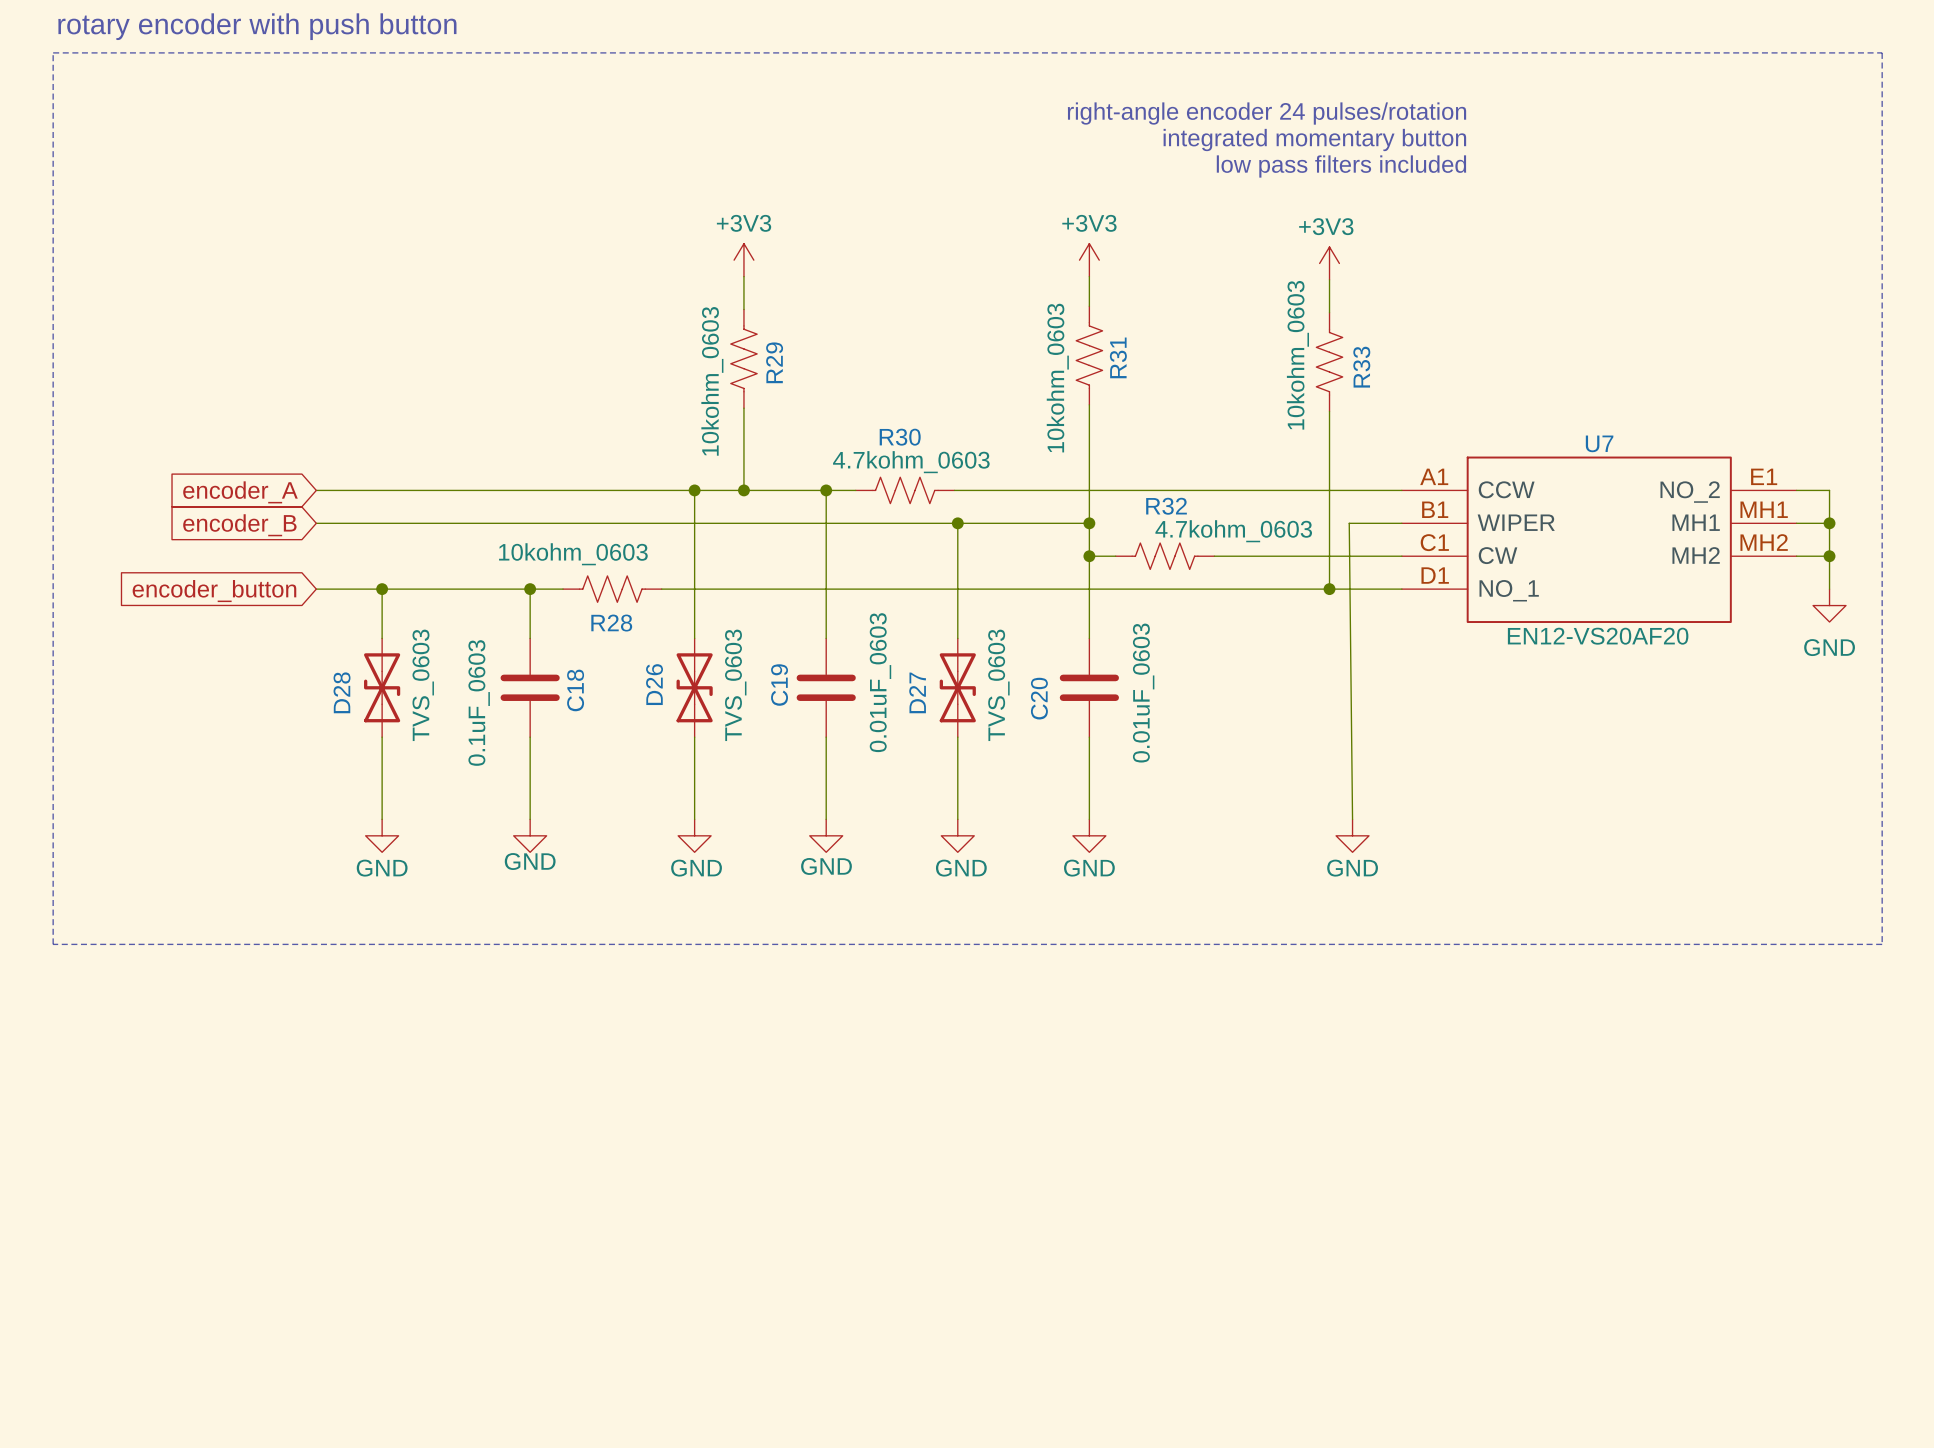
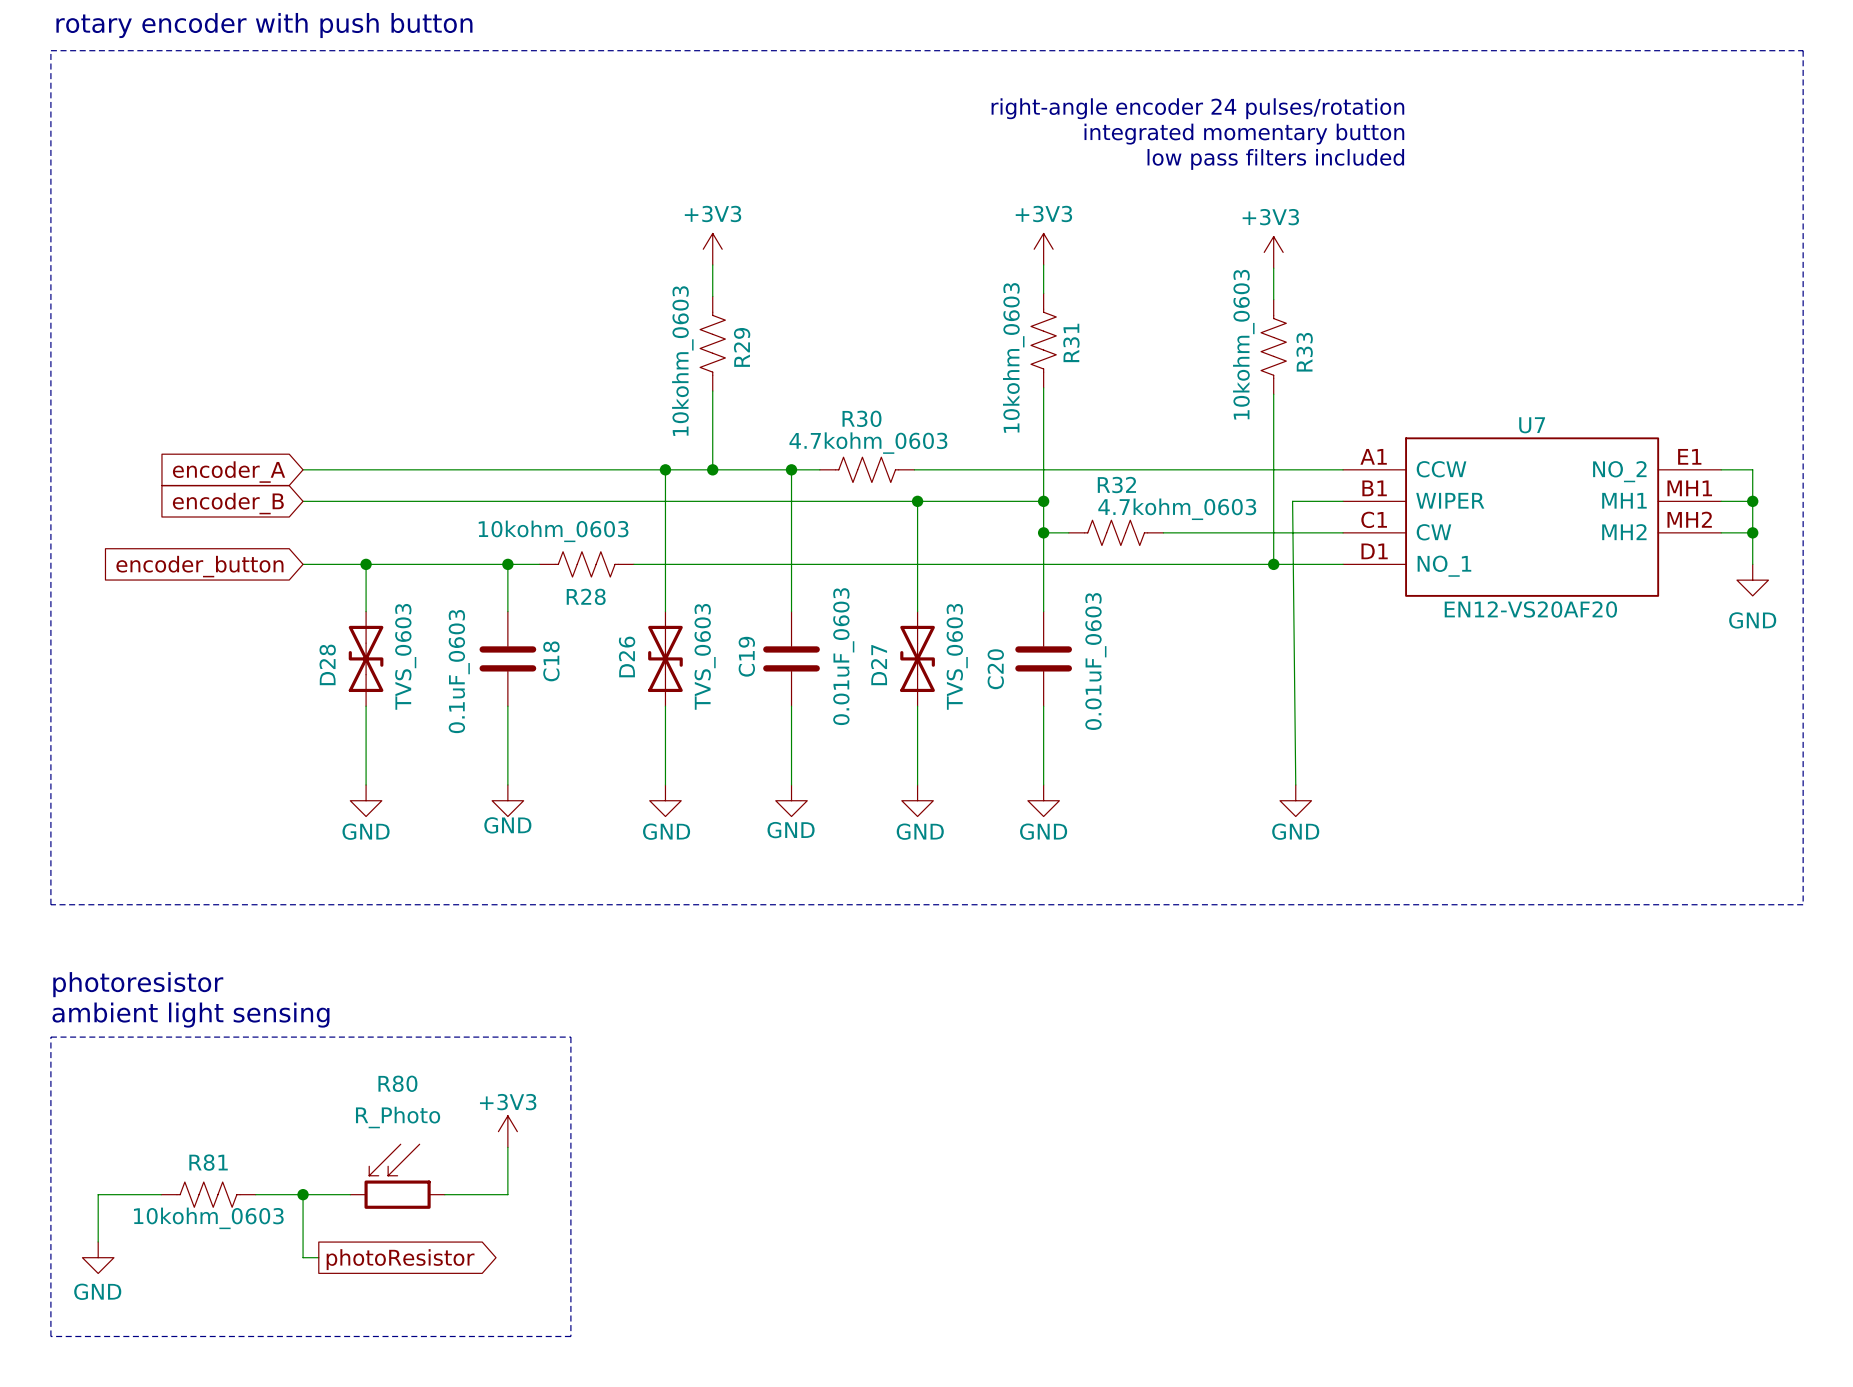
text: none -> photoresistor (138, 984)
text: none -> ambient light sensing (190, 1015)
line: none -> (50, 1037) (570, 1037) (570, 1336) (50, 1336) (50, 1037)
power symbol: none -> +3V3 (507, 1131)
wire: none -> (507, 1147) (507, 1194) (444, 1194)
R80: none -> R_Photo (397, 1176)
wire: none -> (161, 1194) (98, 1194) (98, 1241)
R81: none -> 10kohm_0603 (208, 1194)
wire: none -> (255, 1194) (350, 1194)
wire: none -> (303, 1194) (303, 1257) (318, 1257)
junction: none -> (303, 1194)
power symbol: none -> GND (98, 1257)
global label: none -> photoResistor (400, 1259)

